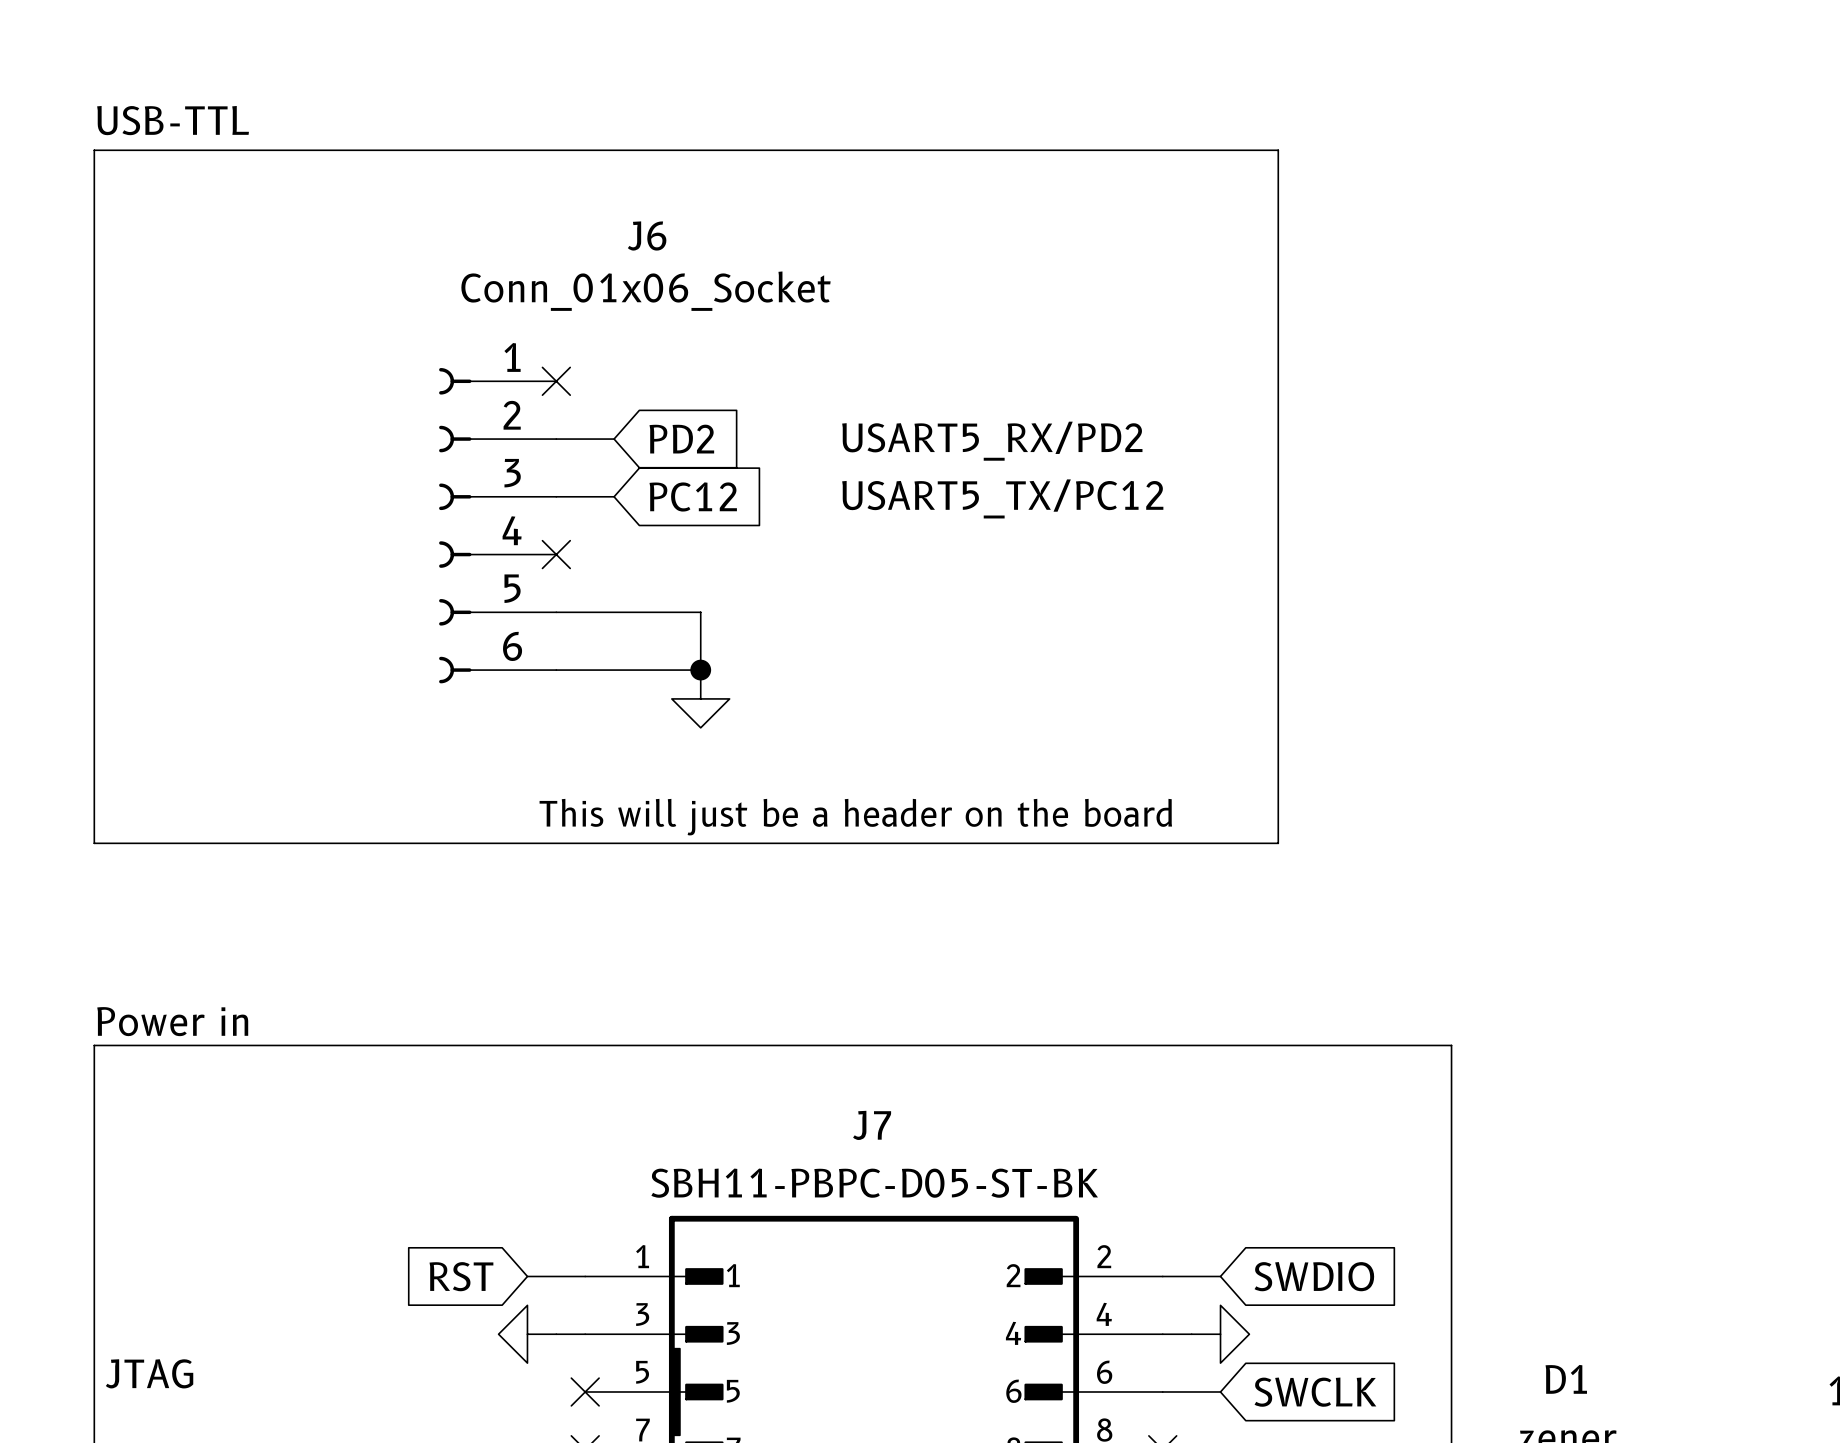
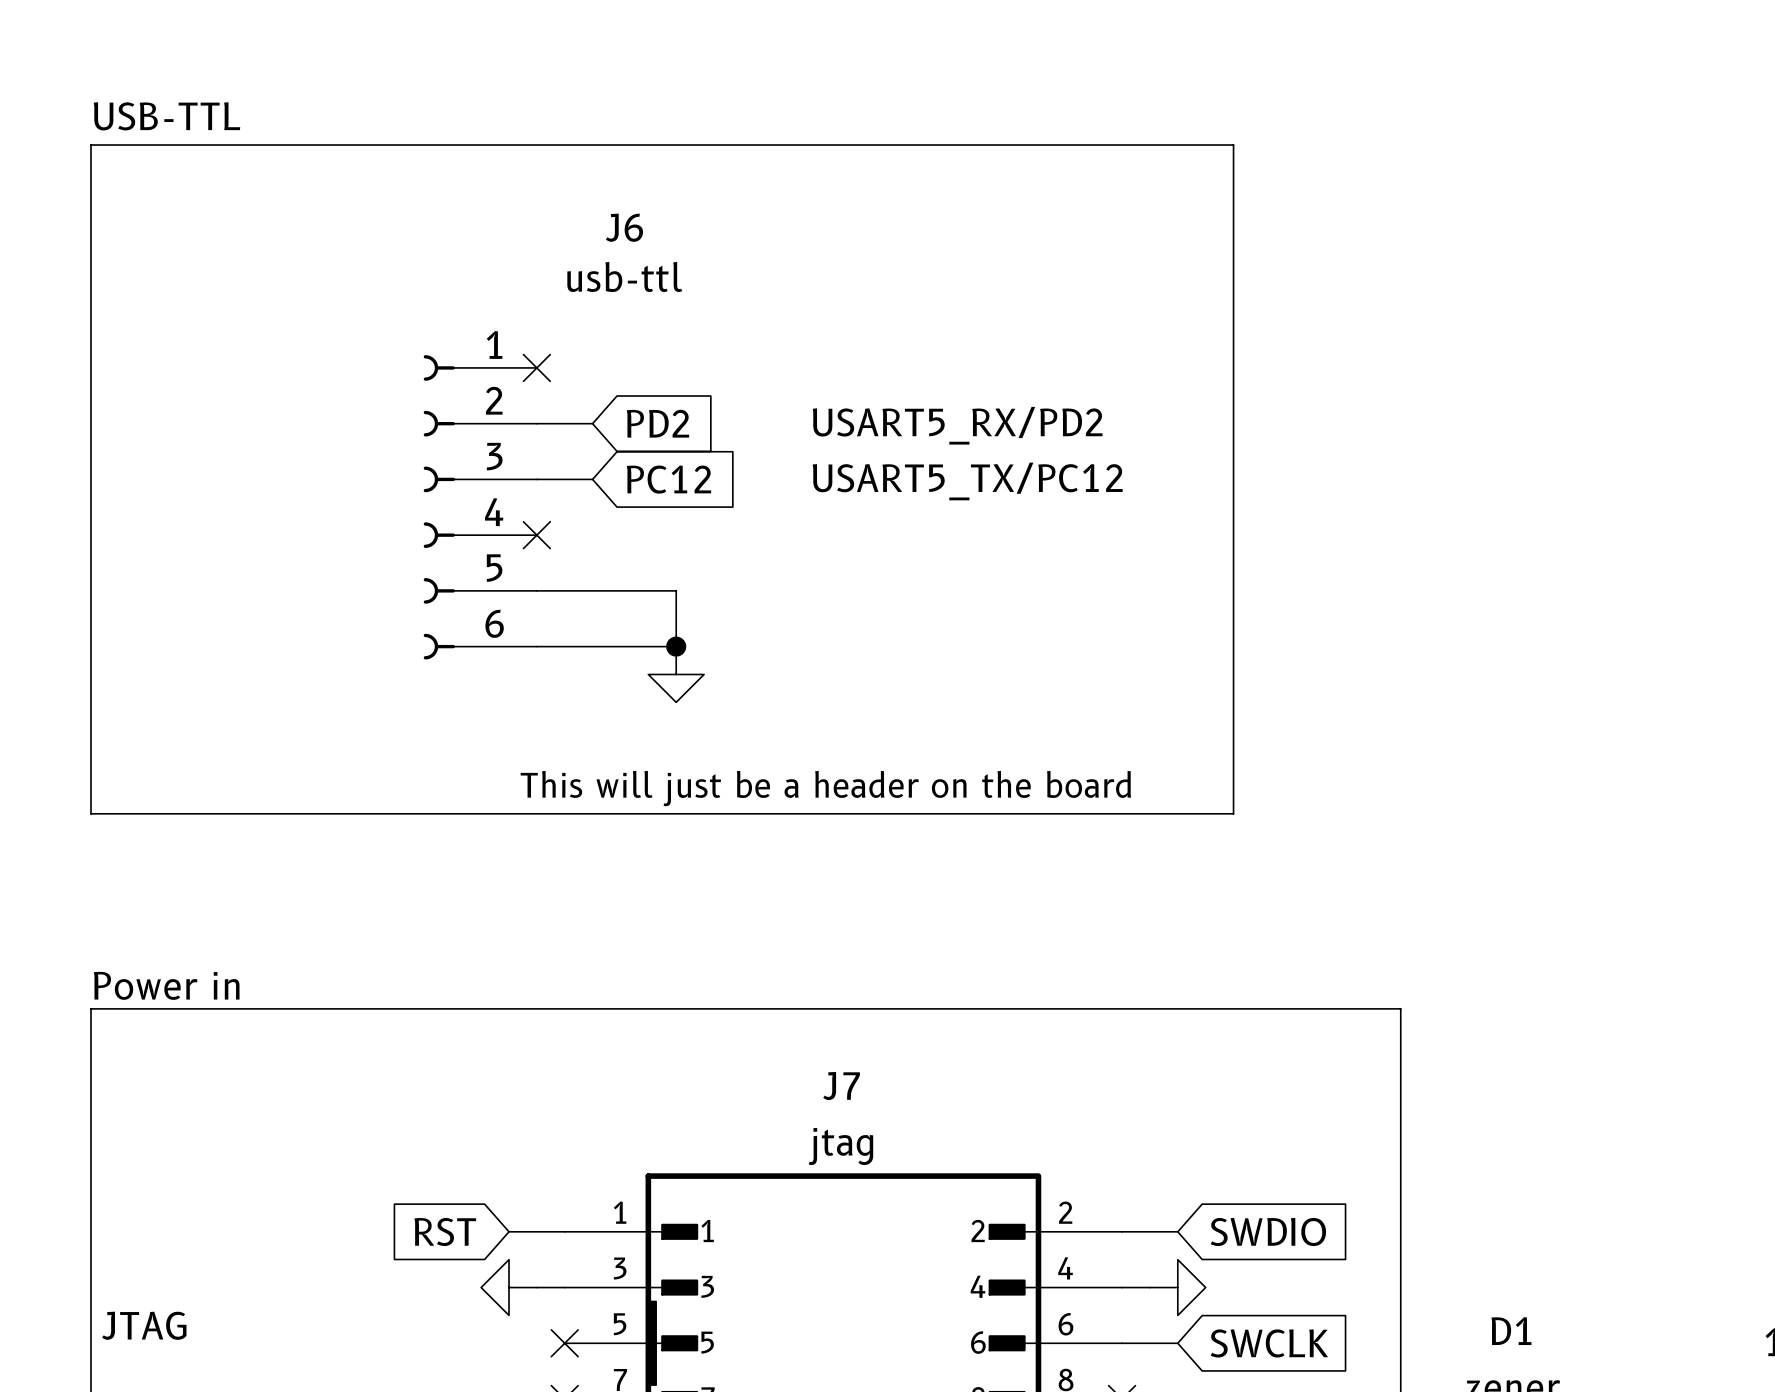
J6 value: Conn_01x06_Socket (646, 291) -> usb-ttl (624, 276)
J7 value: SBH11-PBPC-D05-ST-BK (874, 1183) -> jtag (841, 1146)

